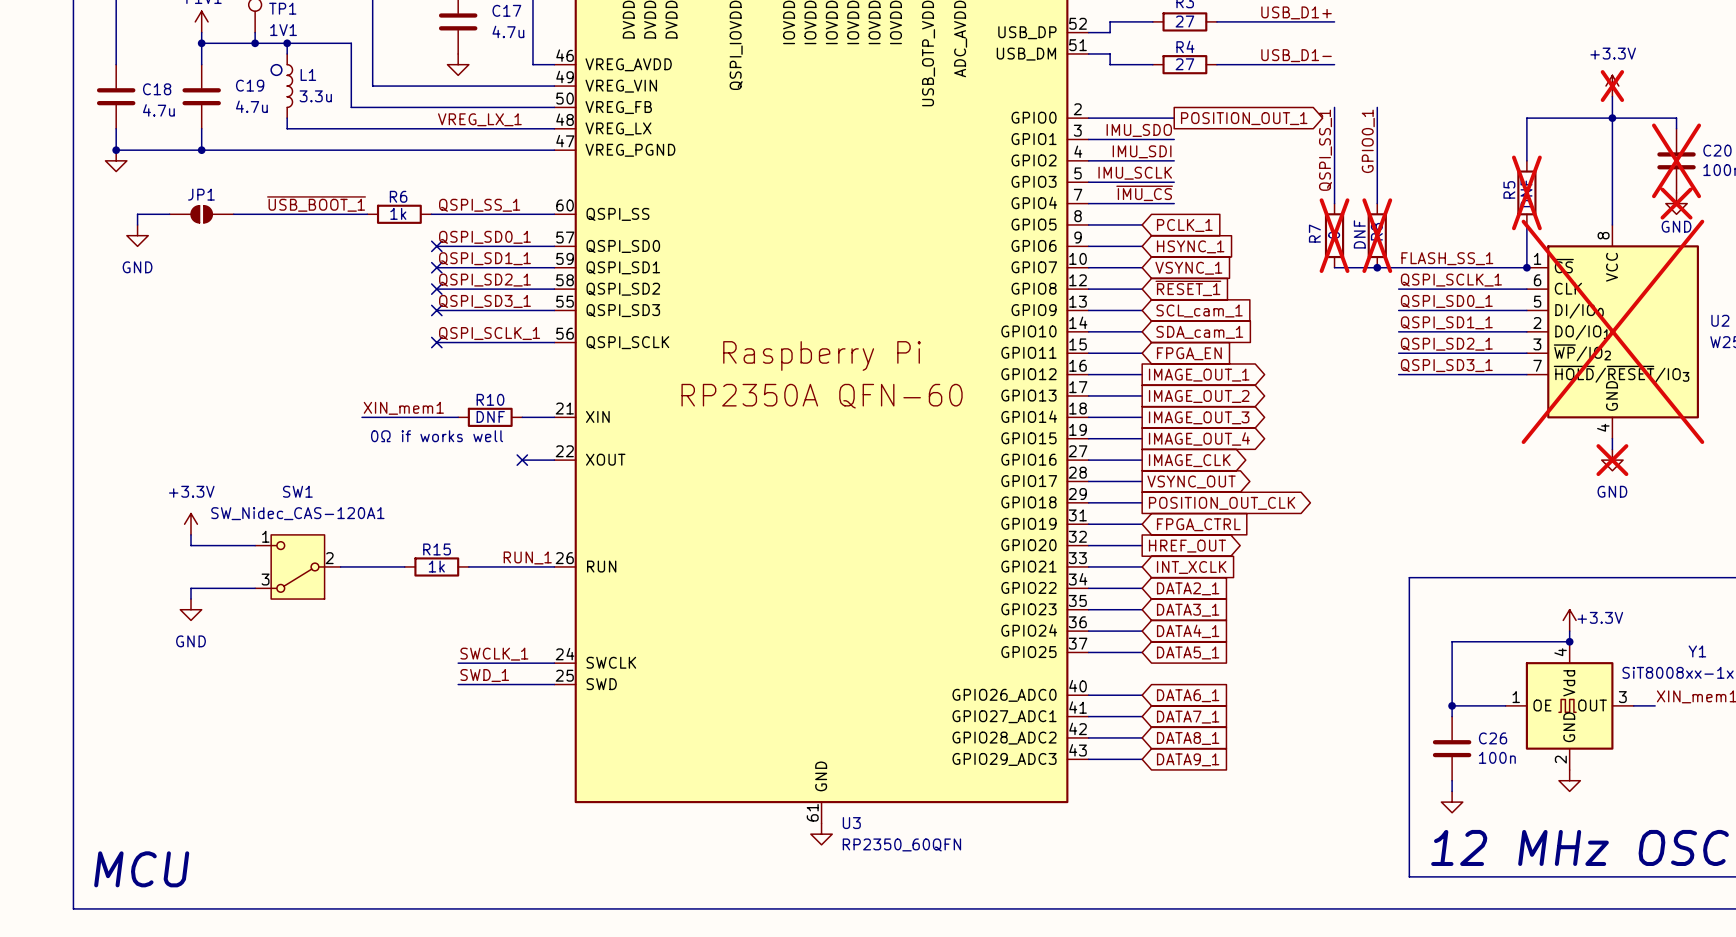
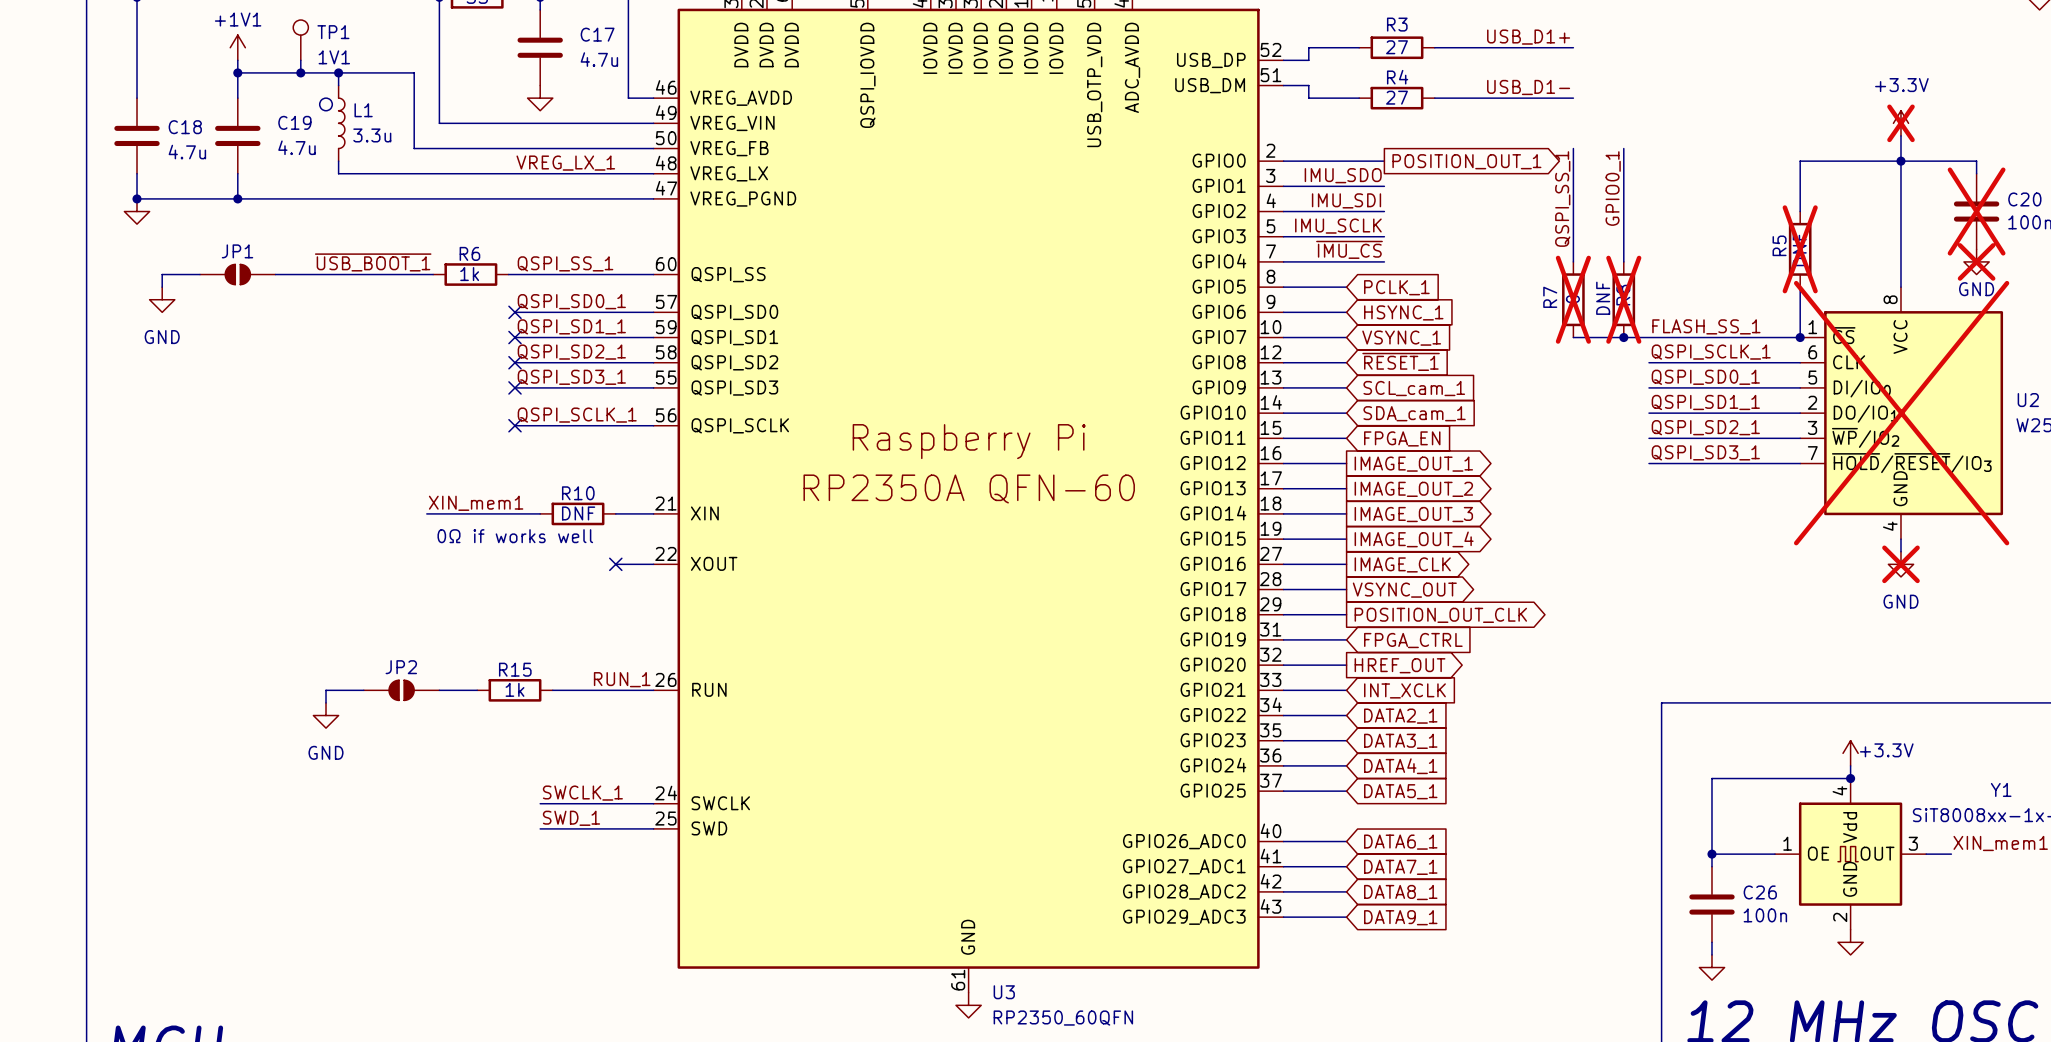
power symbol: +3.3V (191, 524) -> none
wire: (191, 534) (191, 545) (255, 545) -> none
SW1: SW_Nidec_CAS-120A1 (297, 566) -> none
JP2: none -> (401, 690)
wire: (255, 588) (191, 588) (191, 599) -> none
power symbol position: GND (191, 609) -> GND (326, 715)

